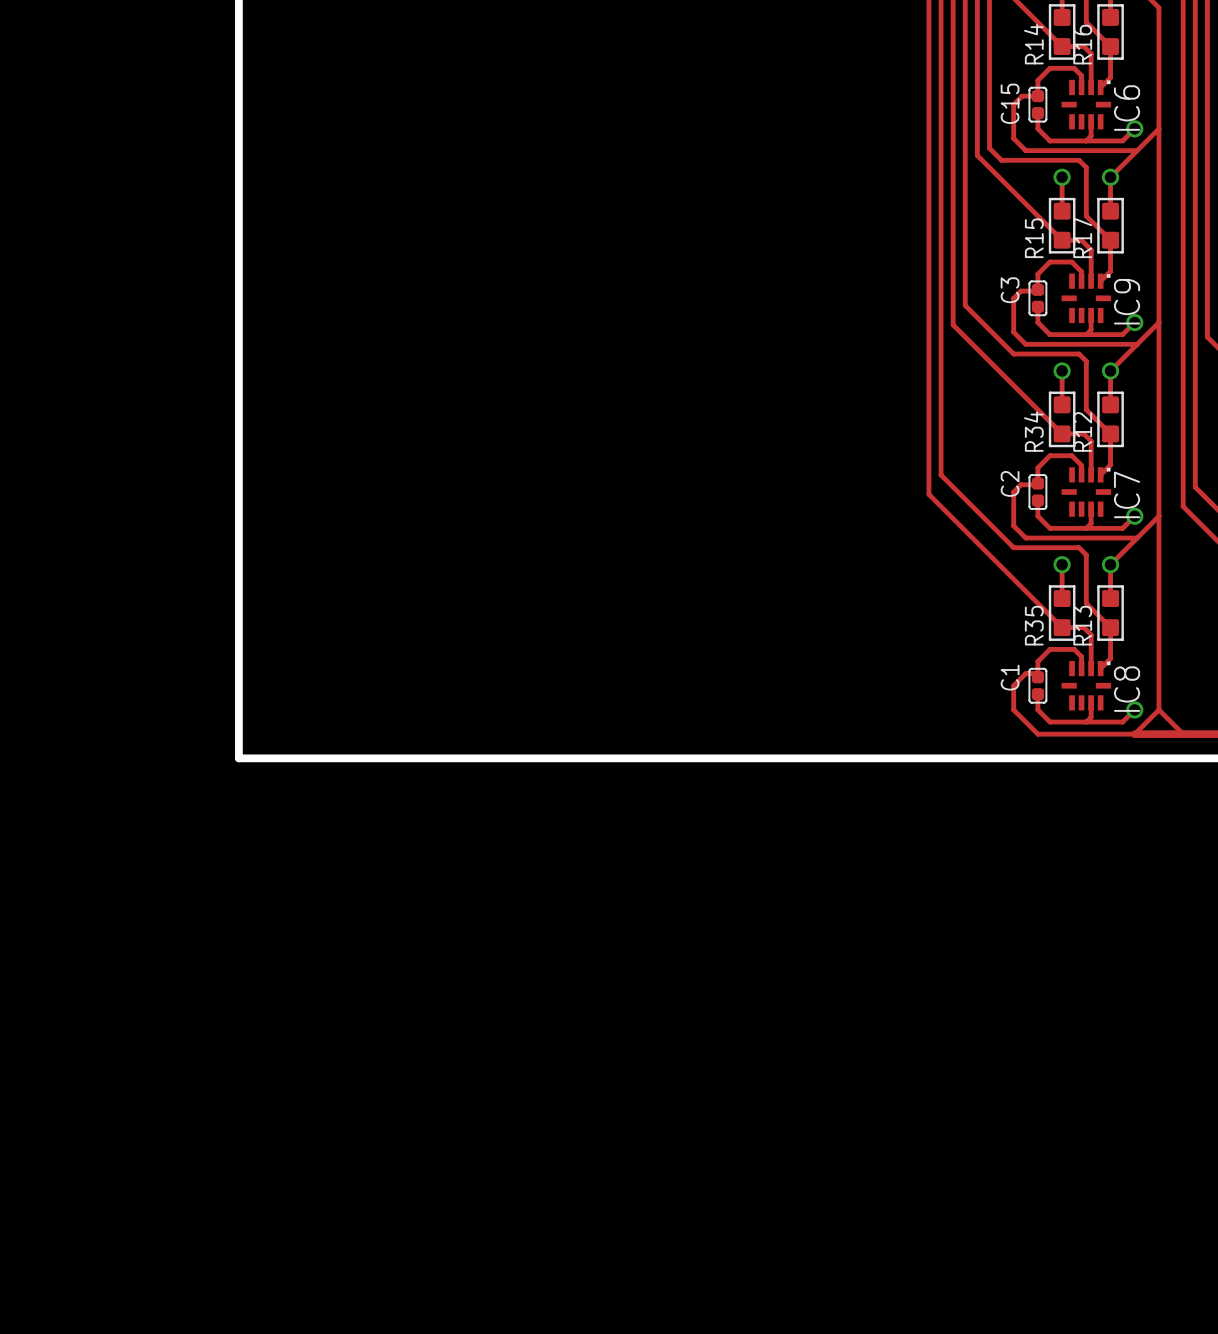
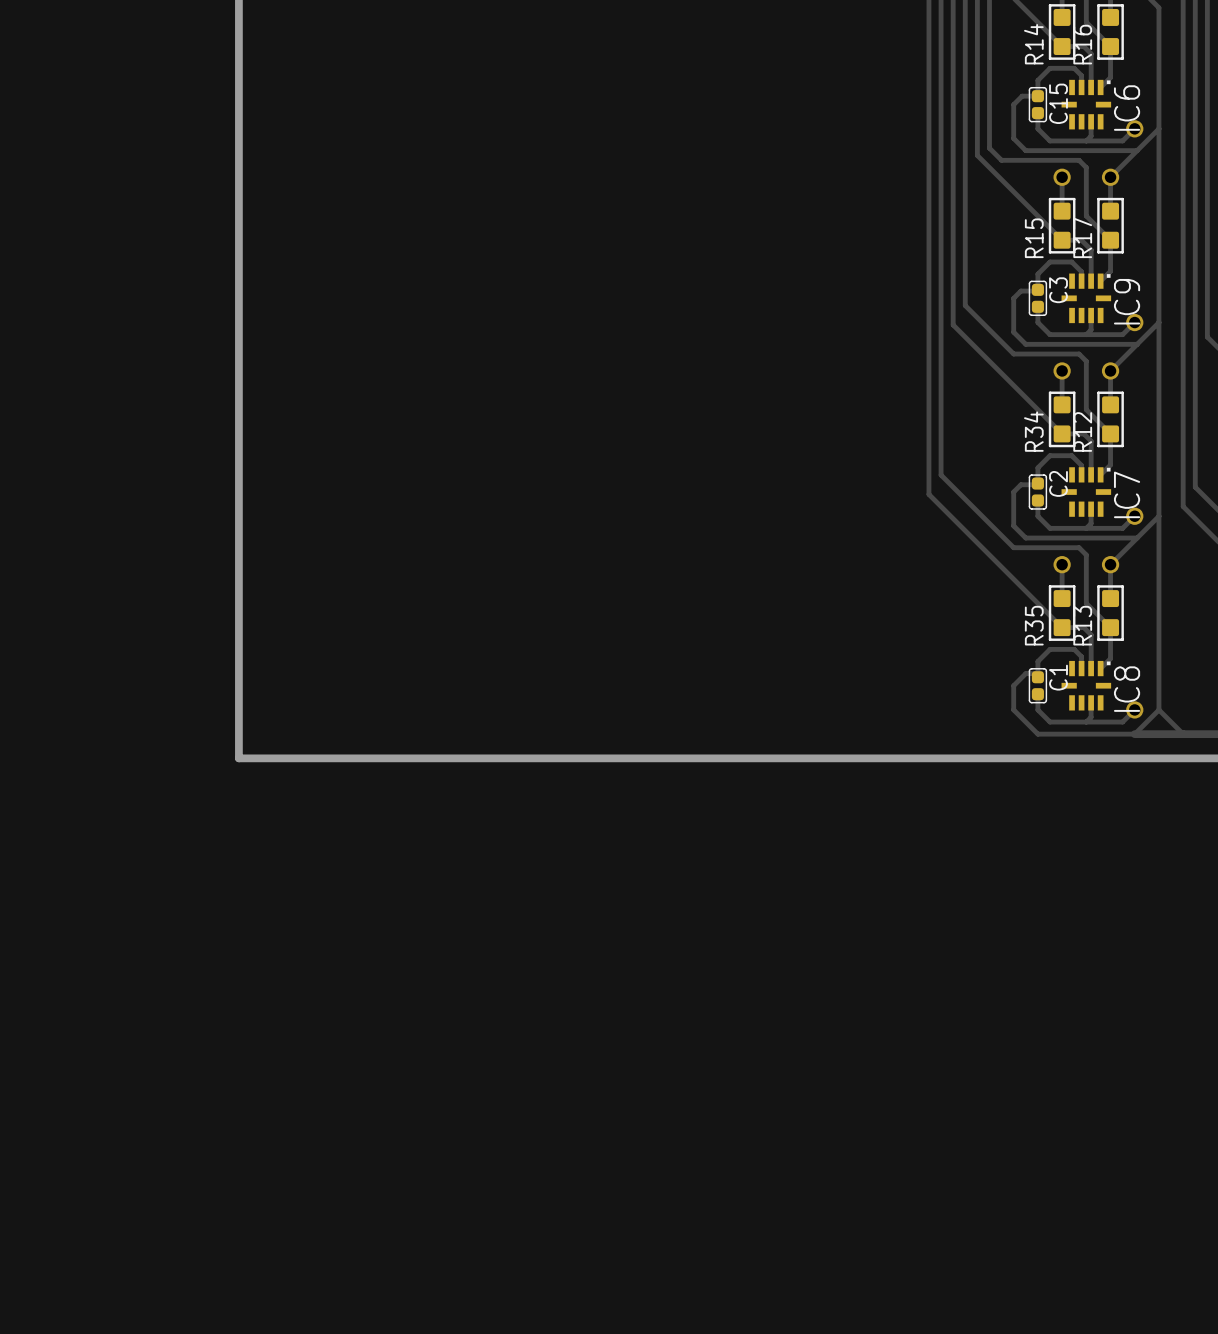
C15 name position: C15 (1010, 103) -> C15 (1058, 103)
C3 name position: C3 (1010, 290) -> C3 (1058, 290)
C2 name position: C2 (1010, 483) -> C2 (1058, 483)
C1 name position: C1 (1010, 677) -> C1 (1058, 677)

